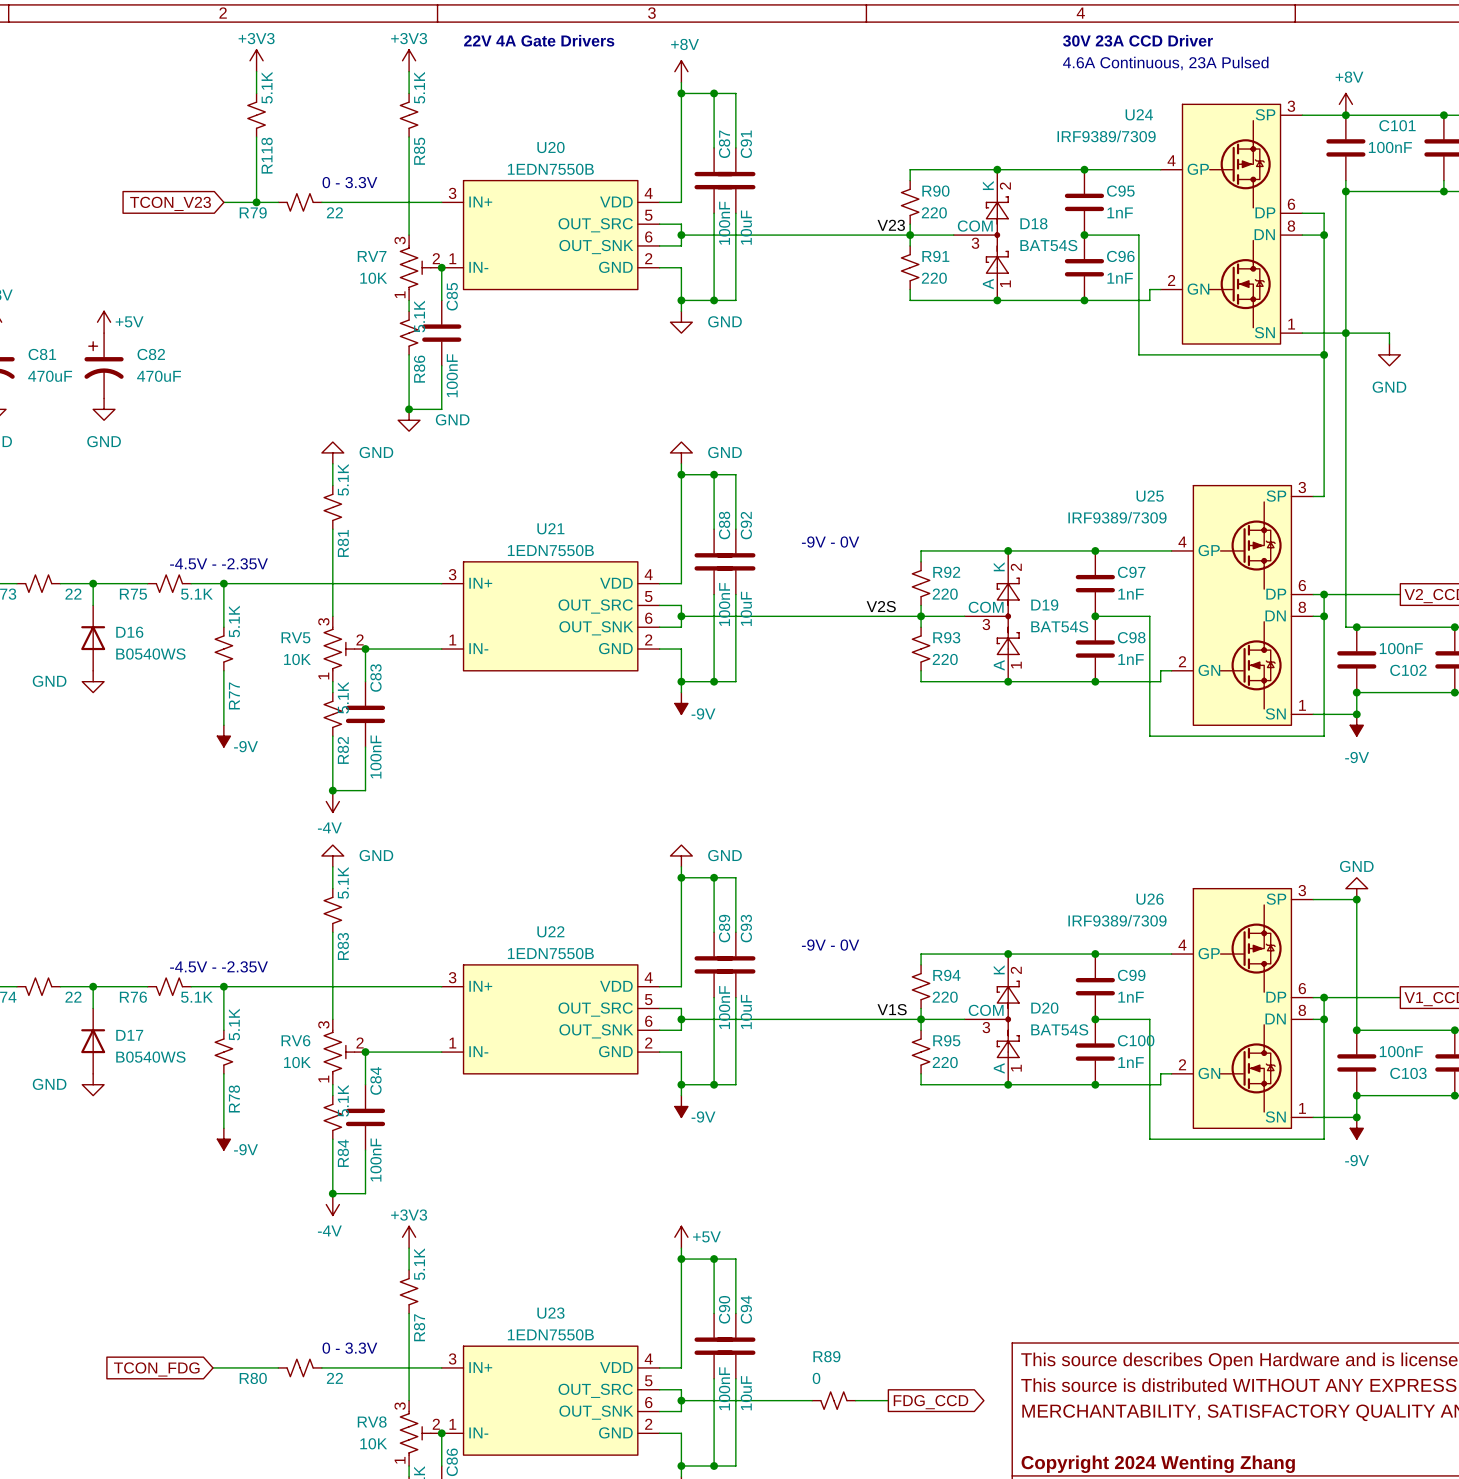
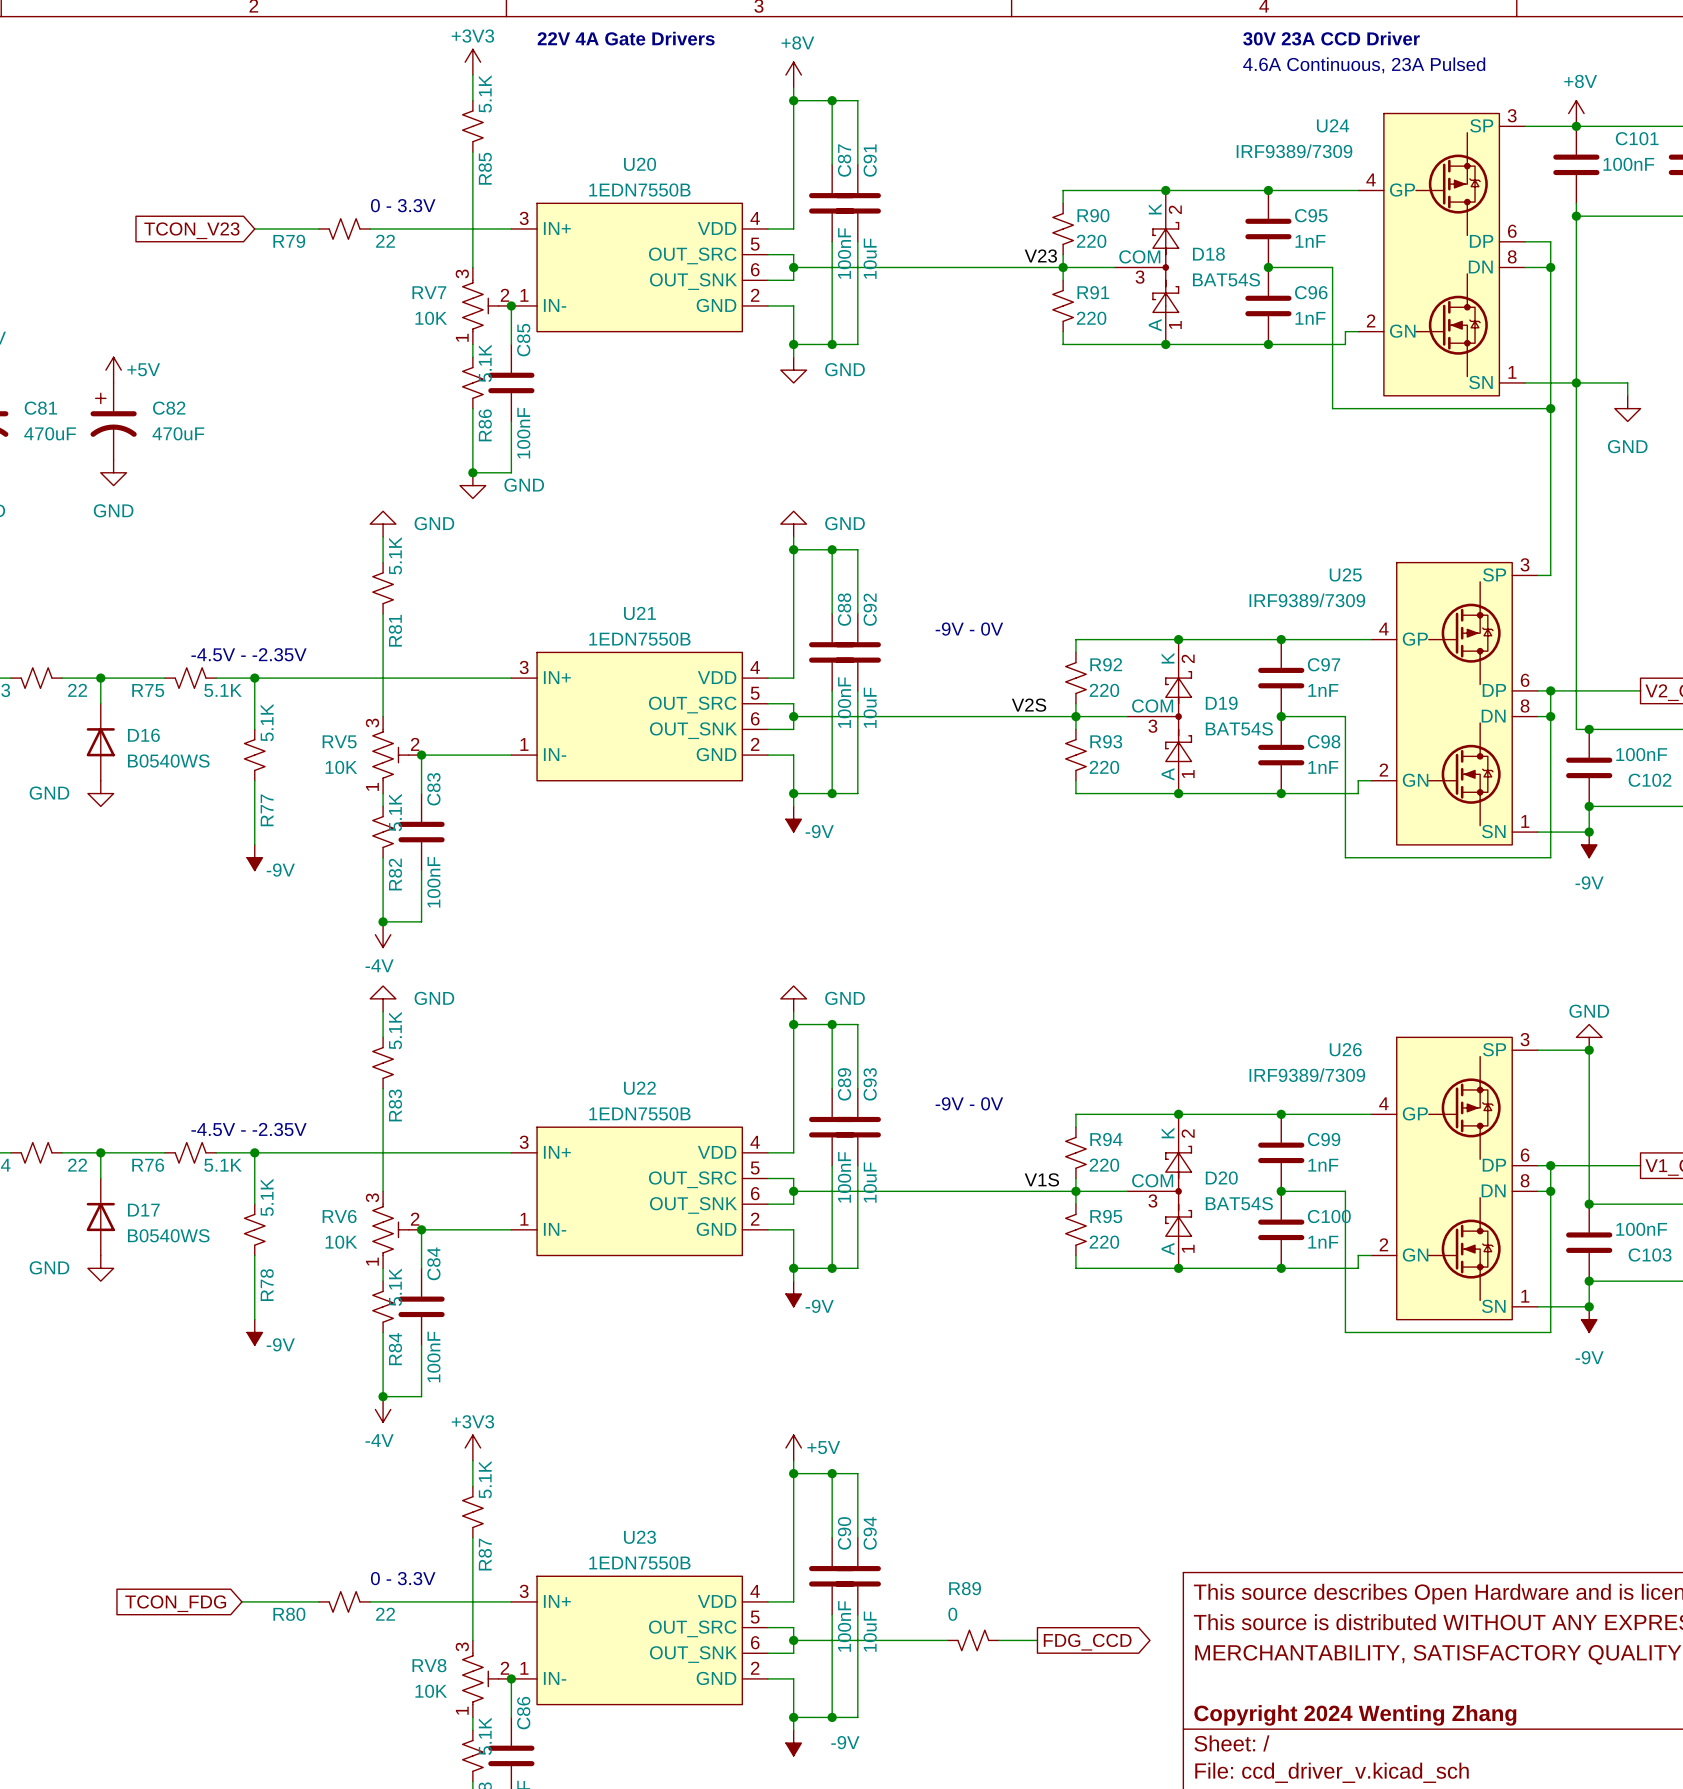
power symbol: +3V3 (256, 60) -> none
wire: (256, 71) (256, 93) -> none
R118: 5.1K (256, 115) -> none
wire: (256, 137) (256, 202) -> none
junction: (256, 202) -> none

